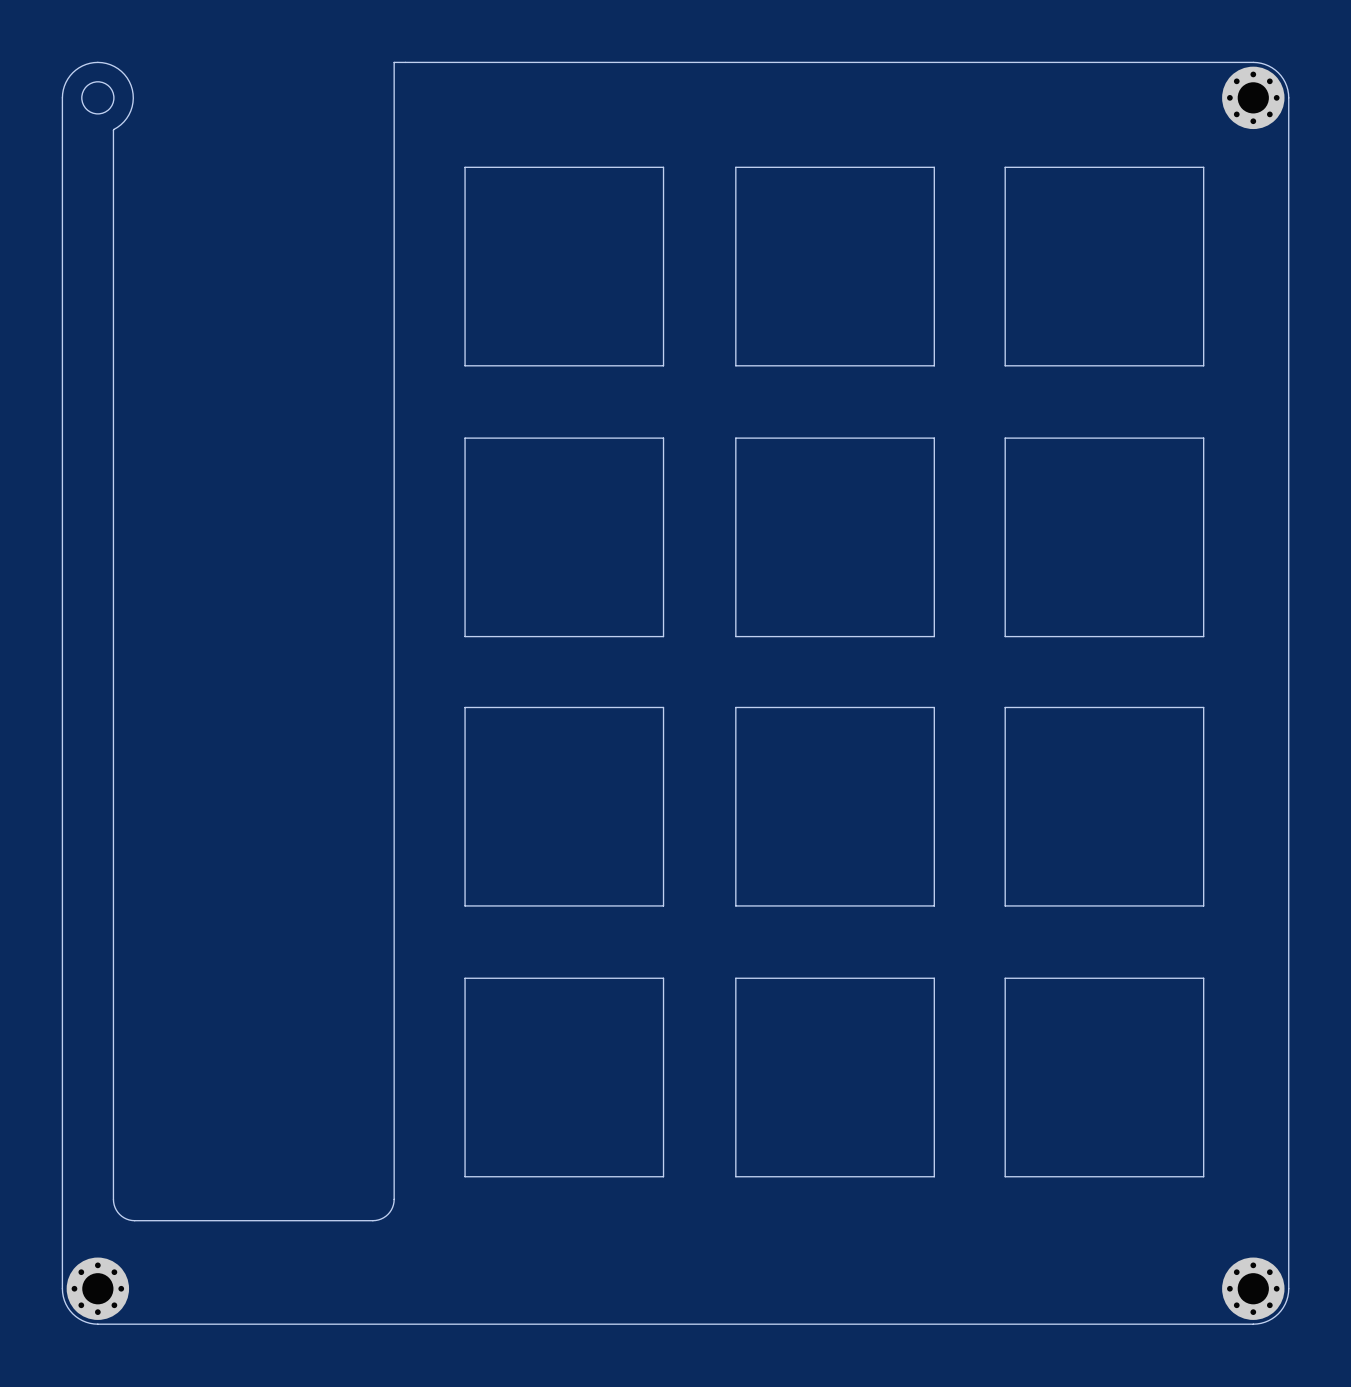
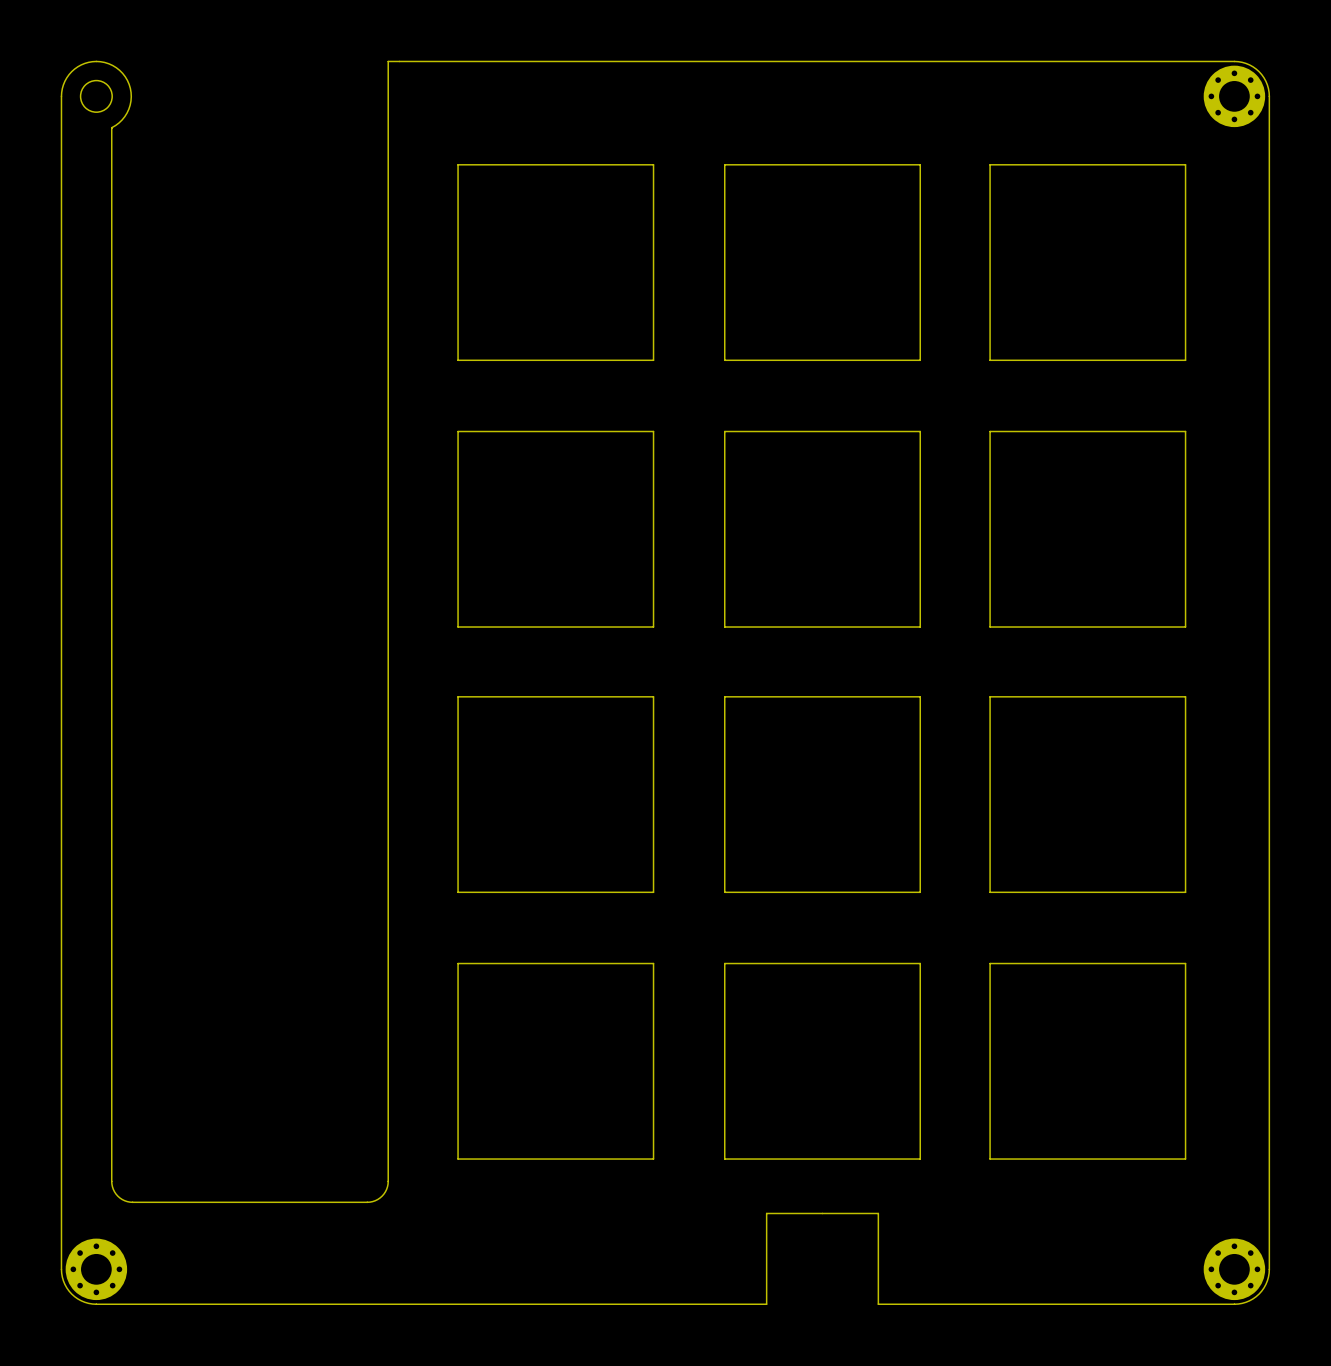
board edge: (778, 1324) (891, 1324) -> (766, 1304) (766, 1213) (878, 1213) (878, 1304)

